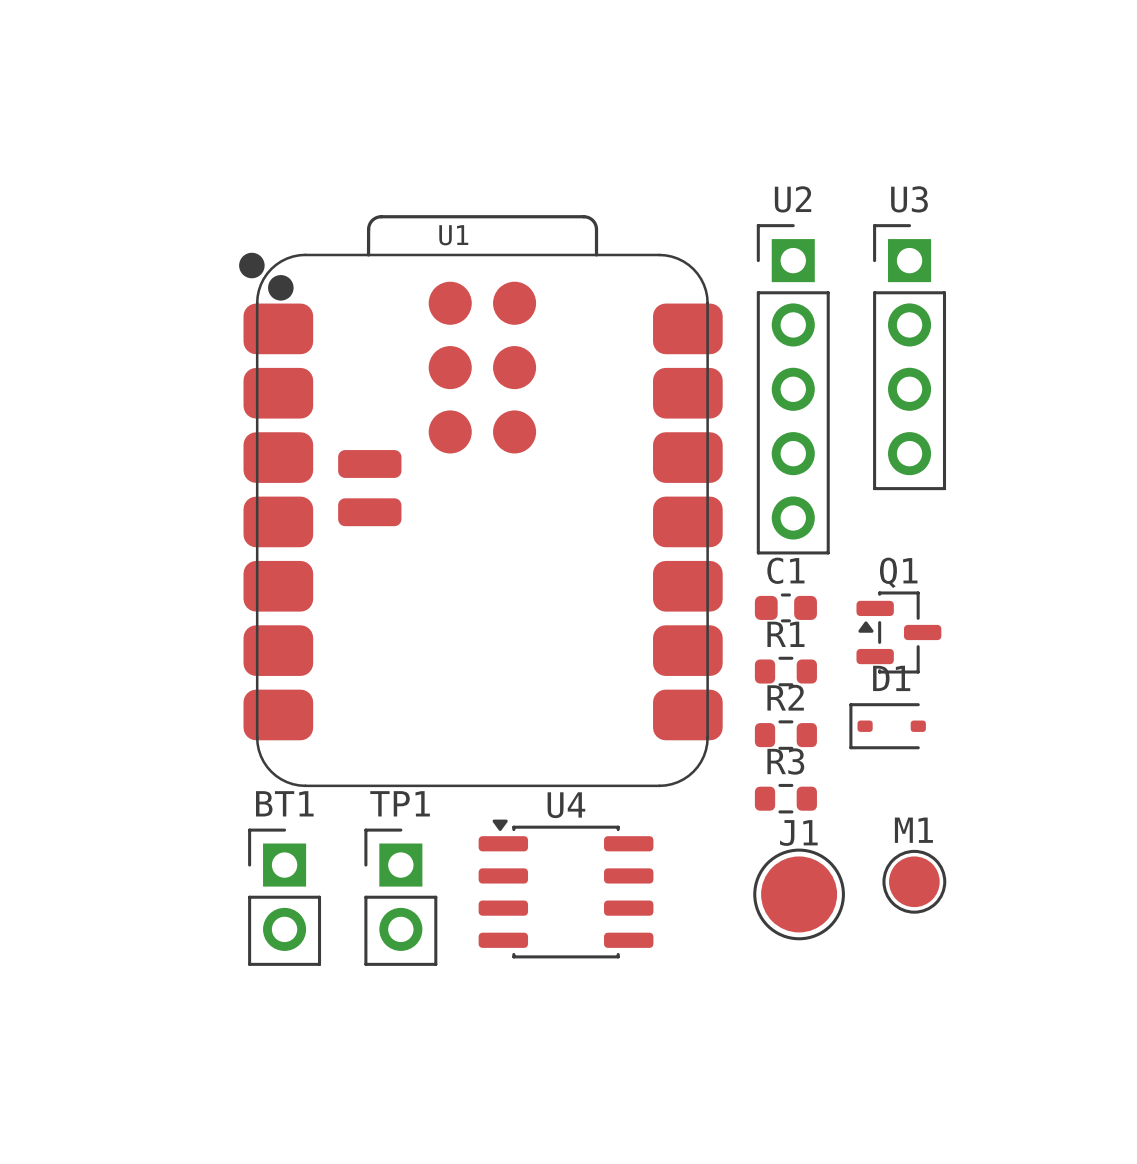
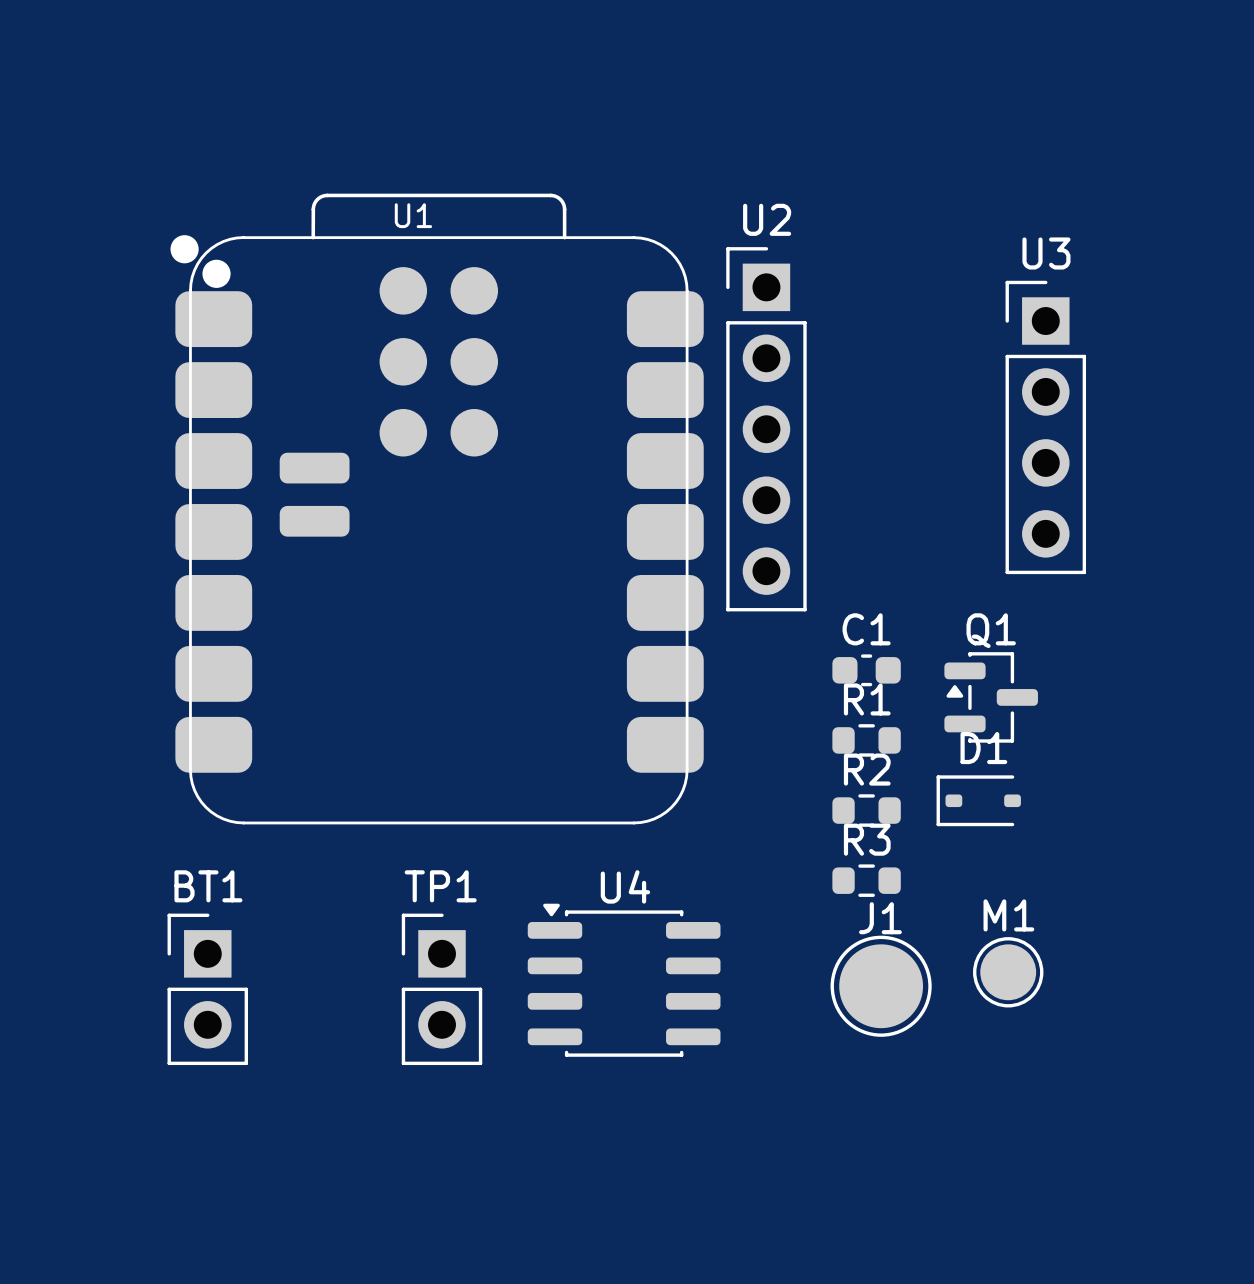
U3 position: (909, 357) -> (1045, 427)
U2 position: (793, 389) -> (766, 429)
U1 position: (480, 501) -> (437, 509)
BT1 position: (284, 897) -> (207, 989)

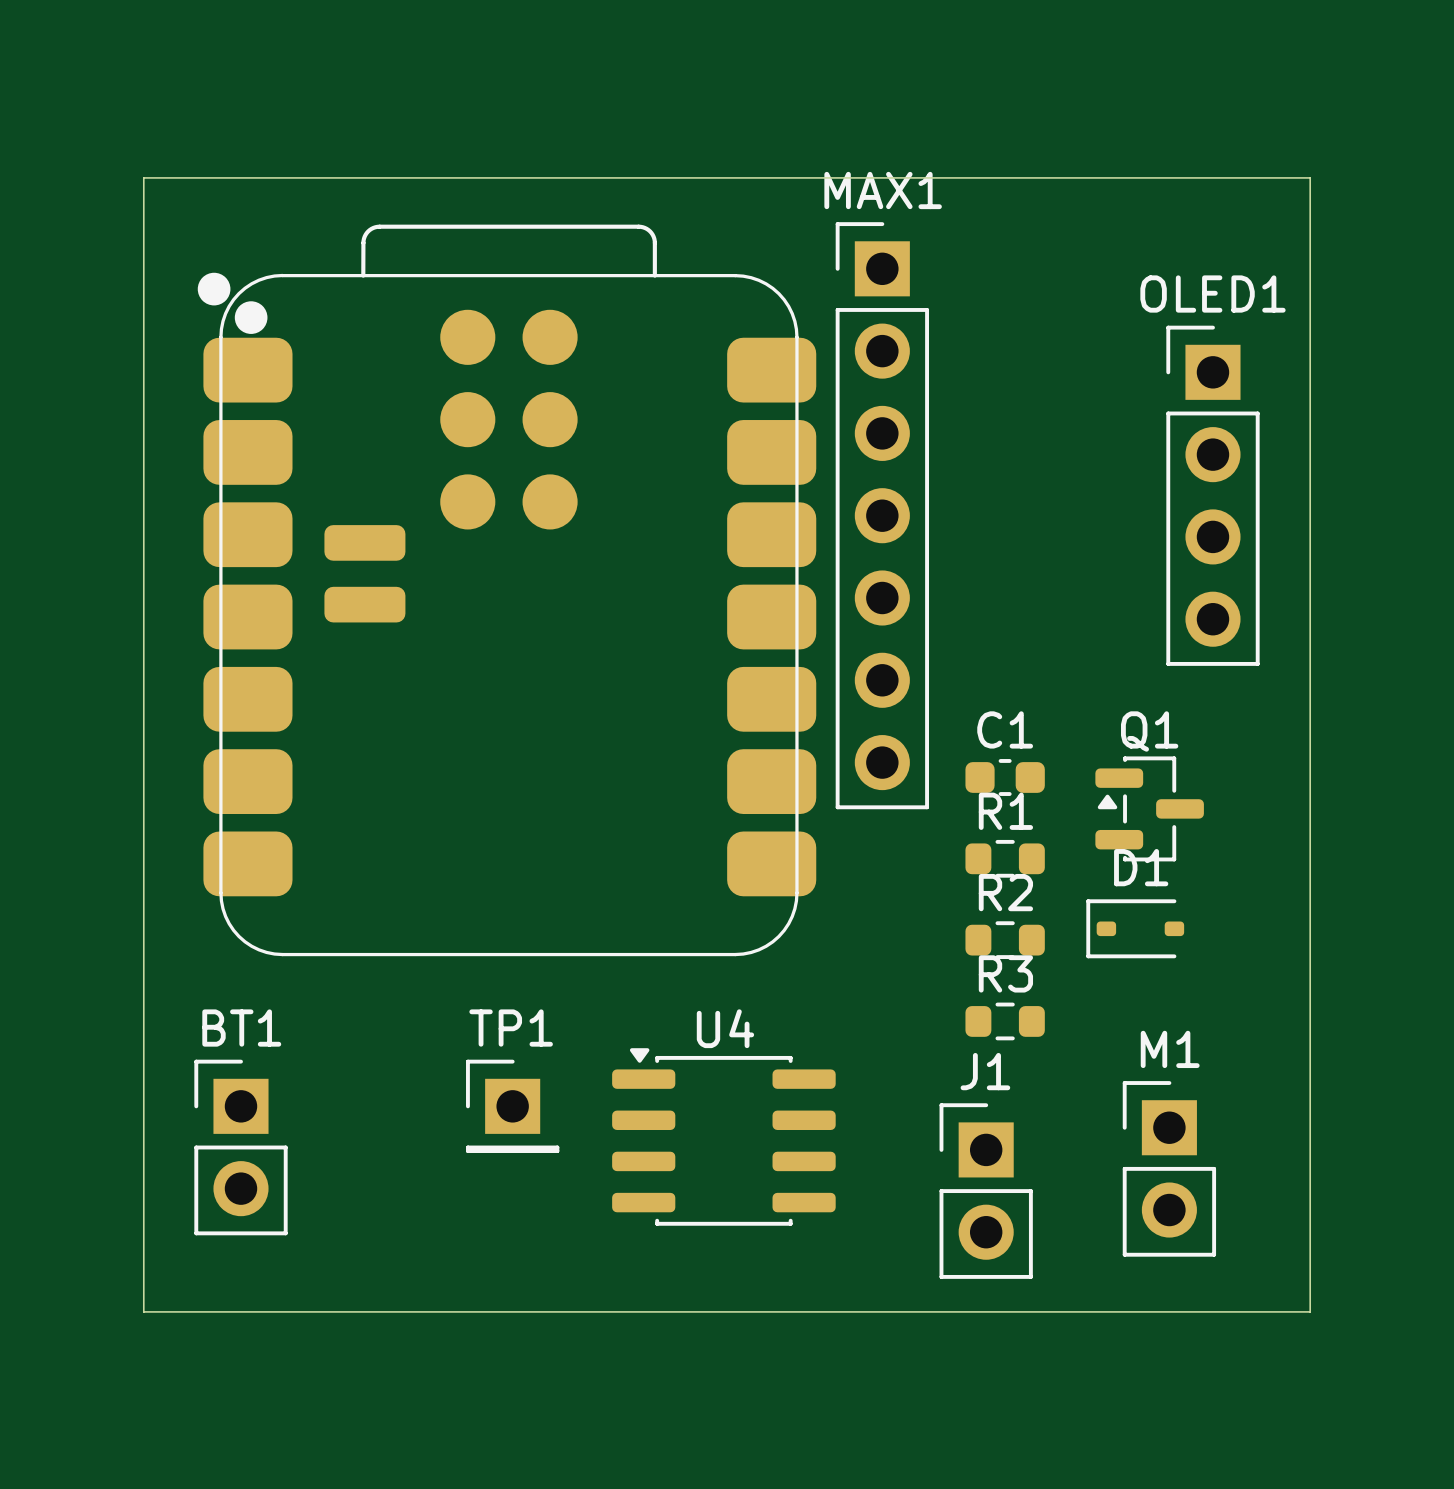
board edge: none -> (143, 177) (1310, 177) (1310, 1311) (143, 1311) (143, 177)
U1 name: U1 (413, 215) -> none
U3 name: U3 (1046, 253) -> OLED1 (1212, 294)
U2: (766, 429) -> none
MAX1: none -> (882, 515)
TP1 footprint: [401, 913, 483, 1066] -> [466, 1059, 560, 1154]
J1 footprint: [830, 935, 932, 1037] -> [939, 1103, 1033, 1279]
M1 footprint: [973, 937, 1044, 1008] -> [1122, 1081, 1217, 1257]

